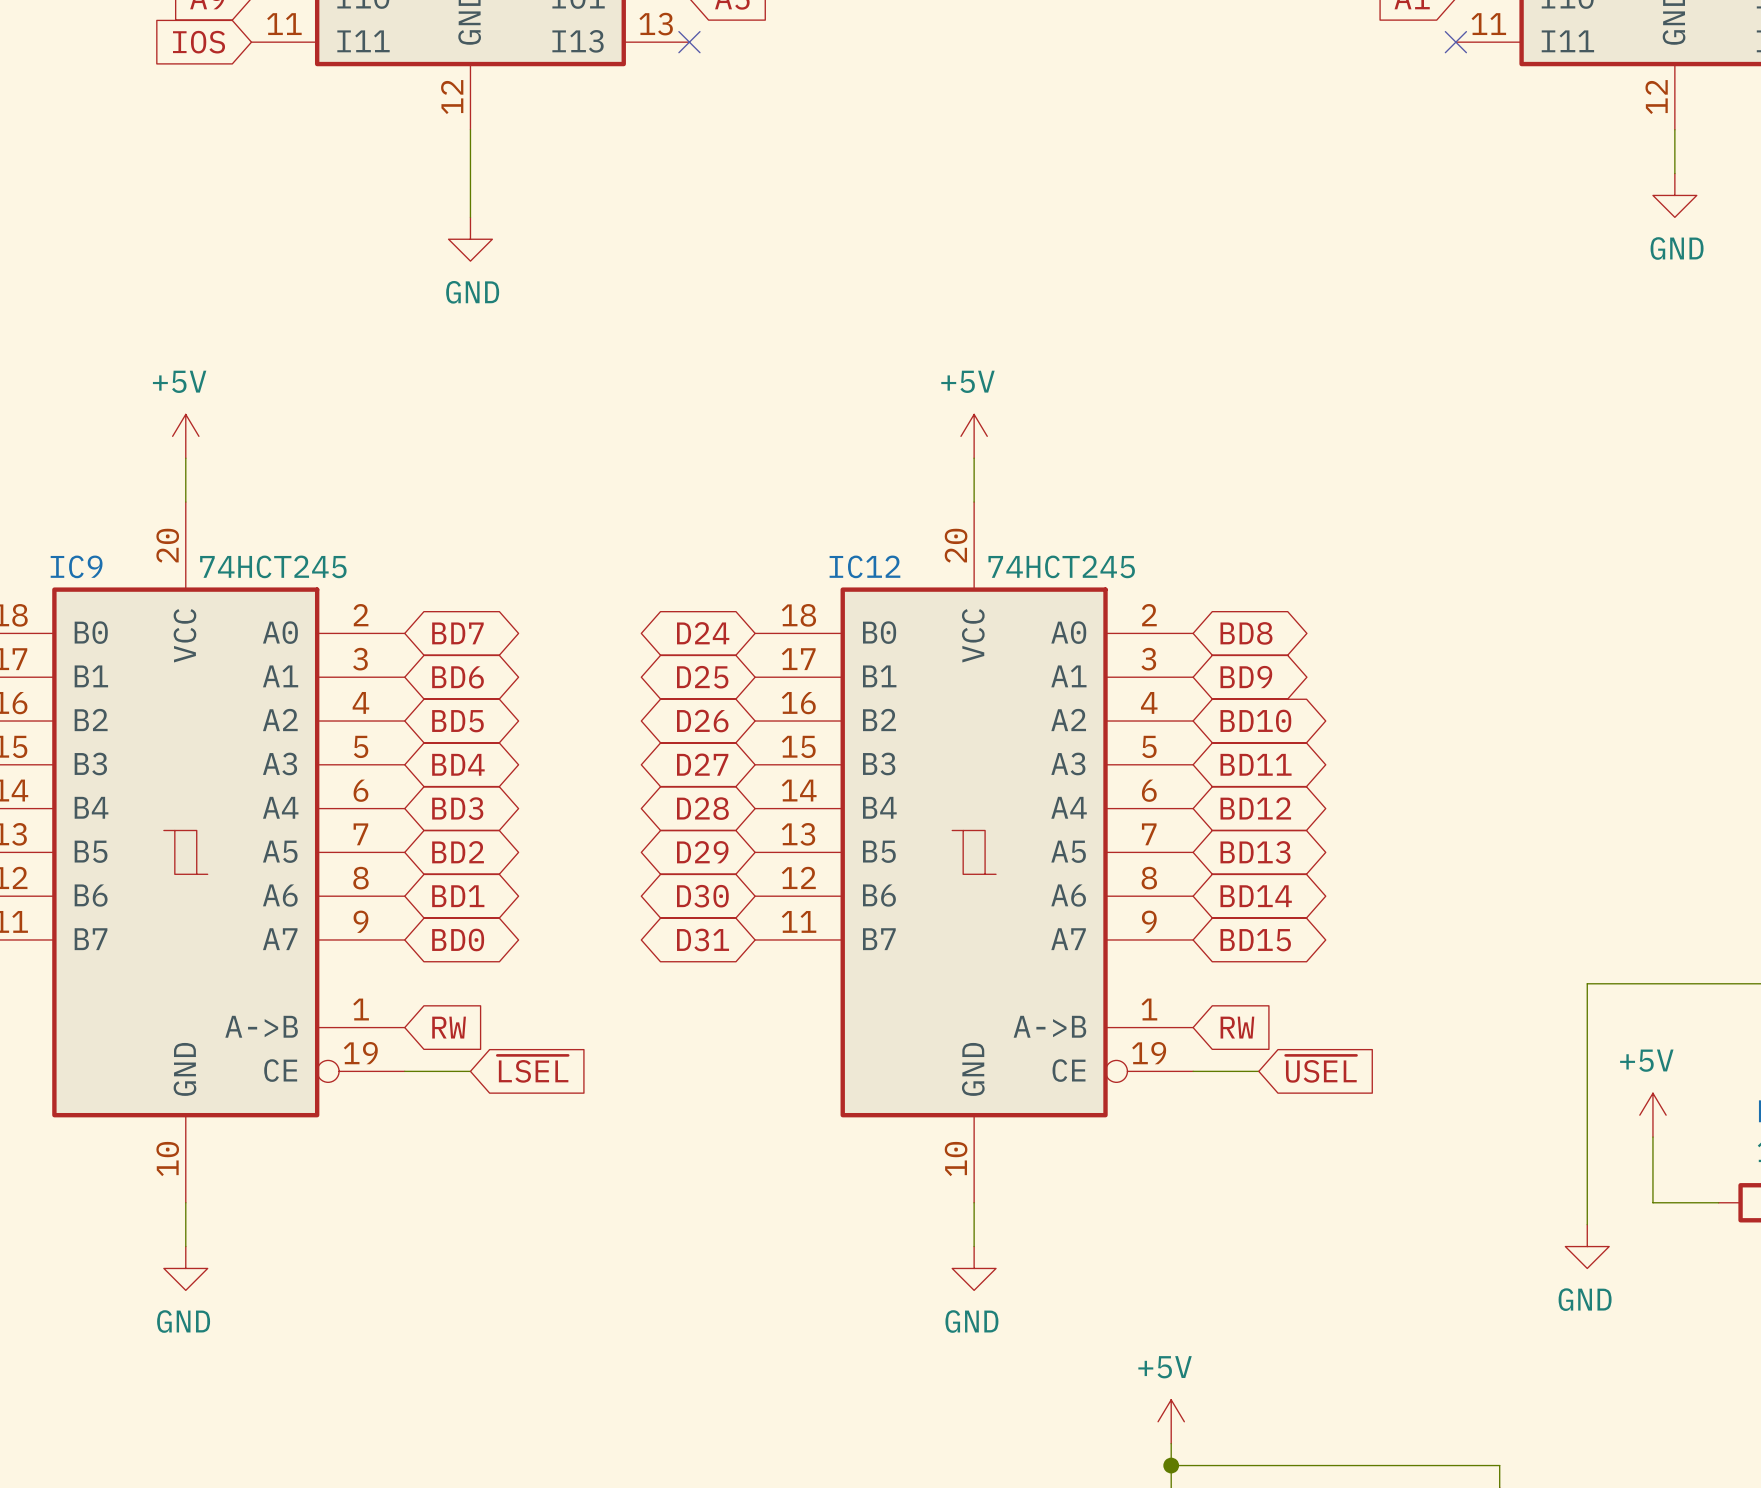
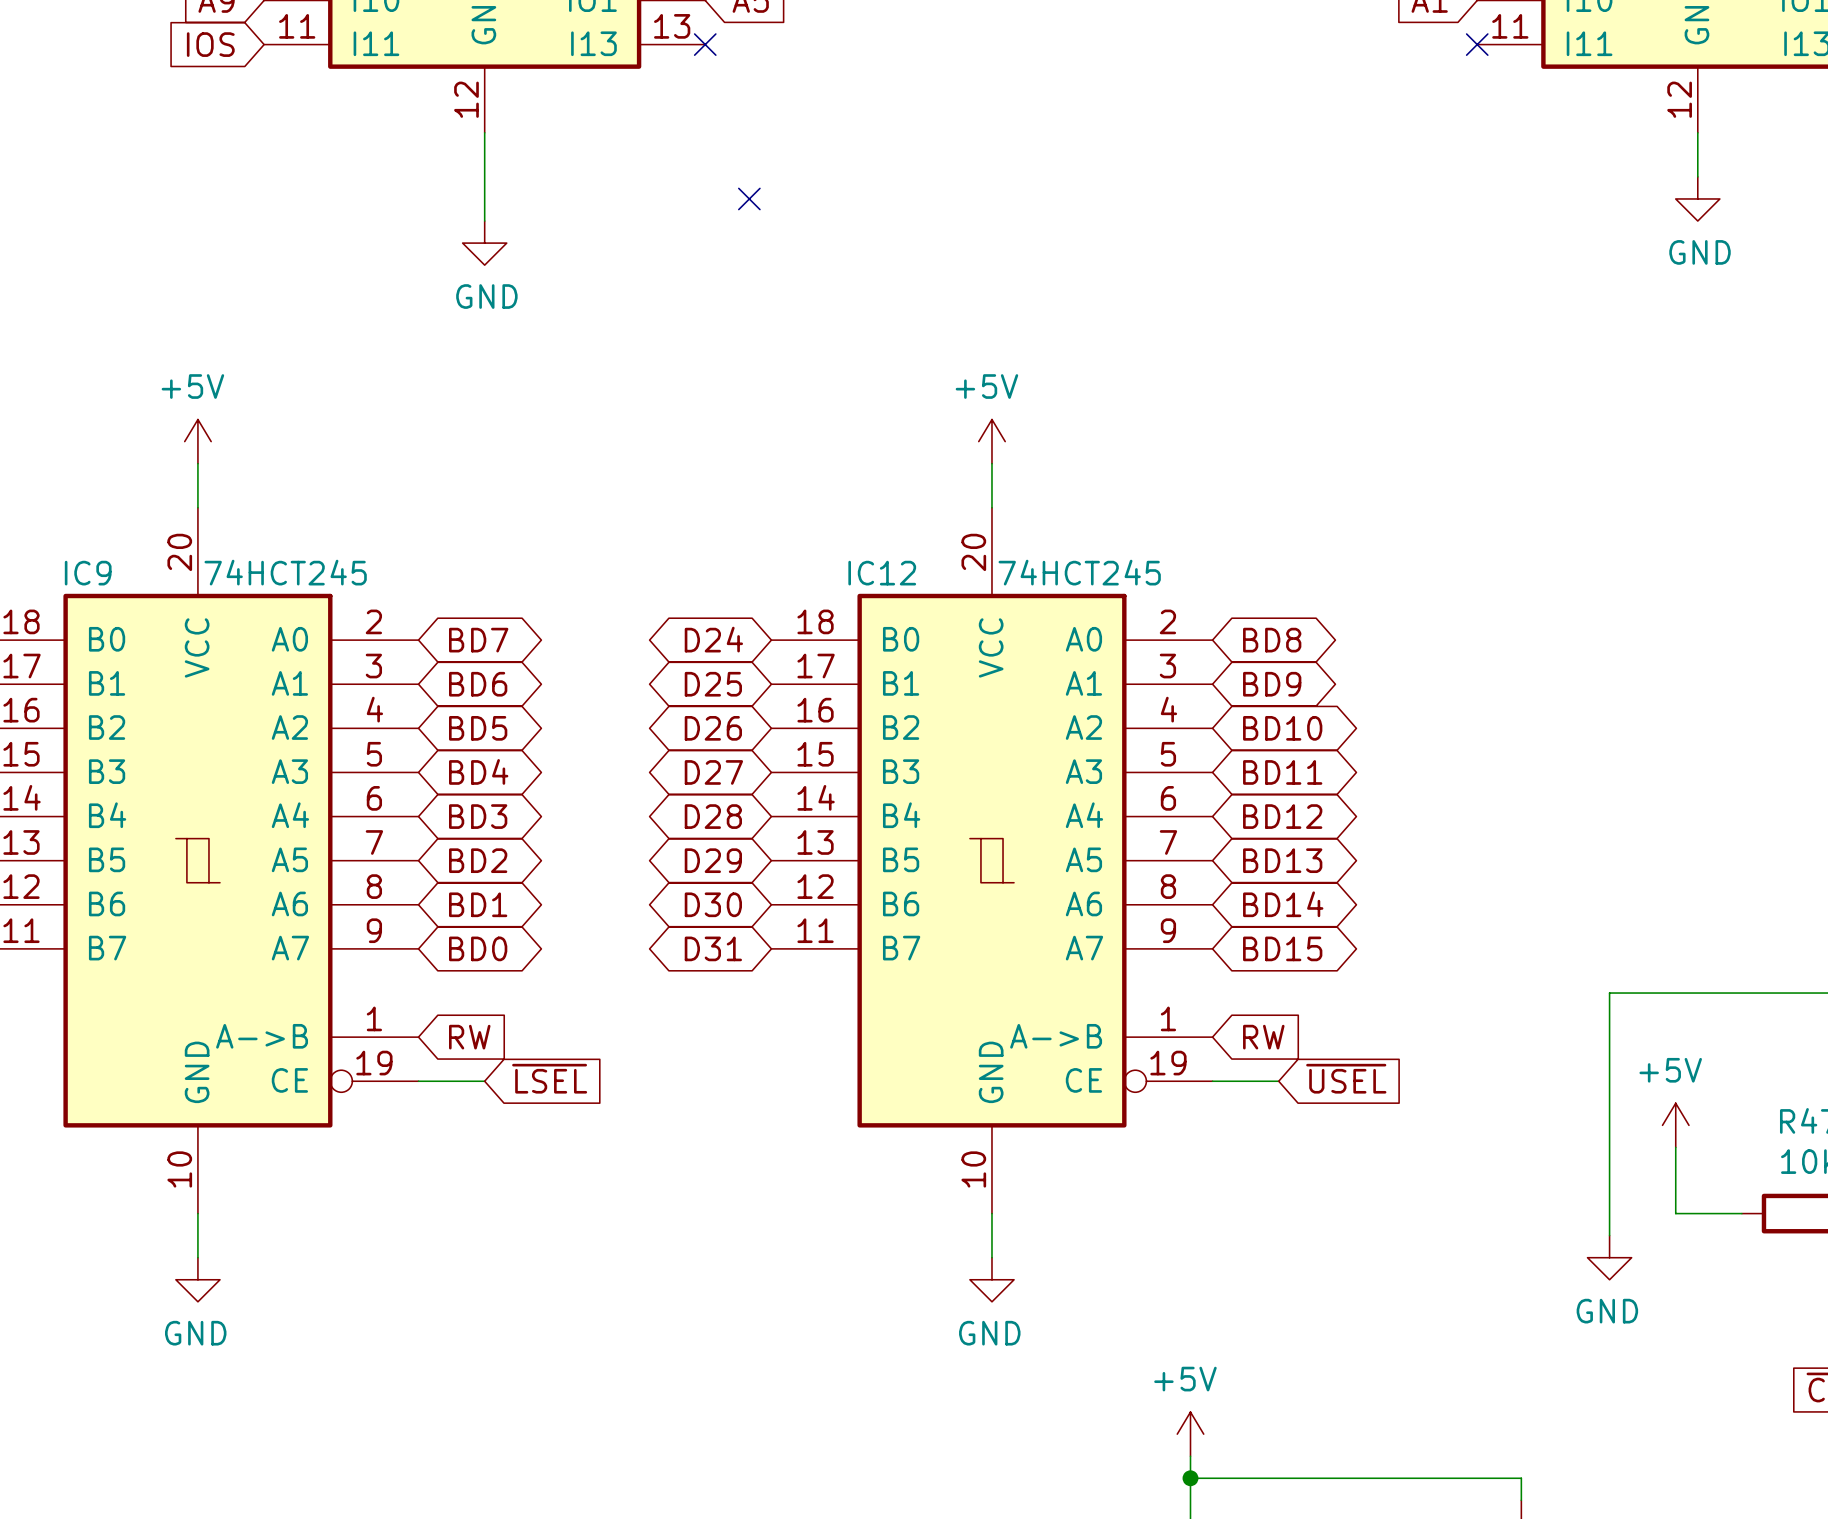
no-connect mark: none -> (749, 198)

